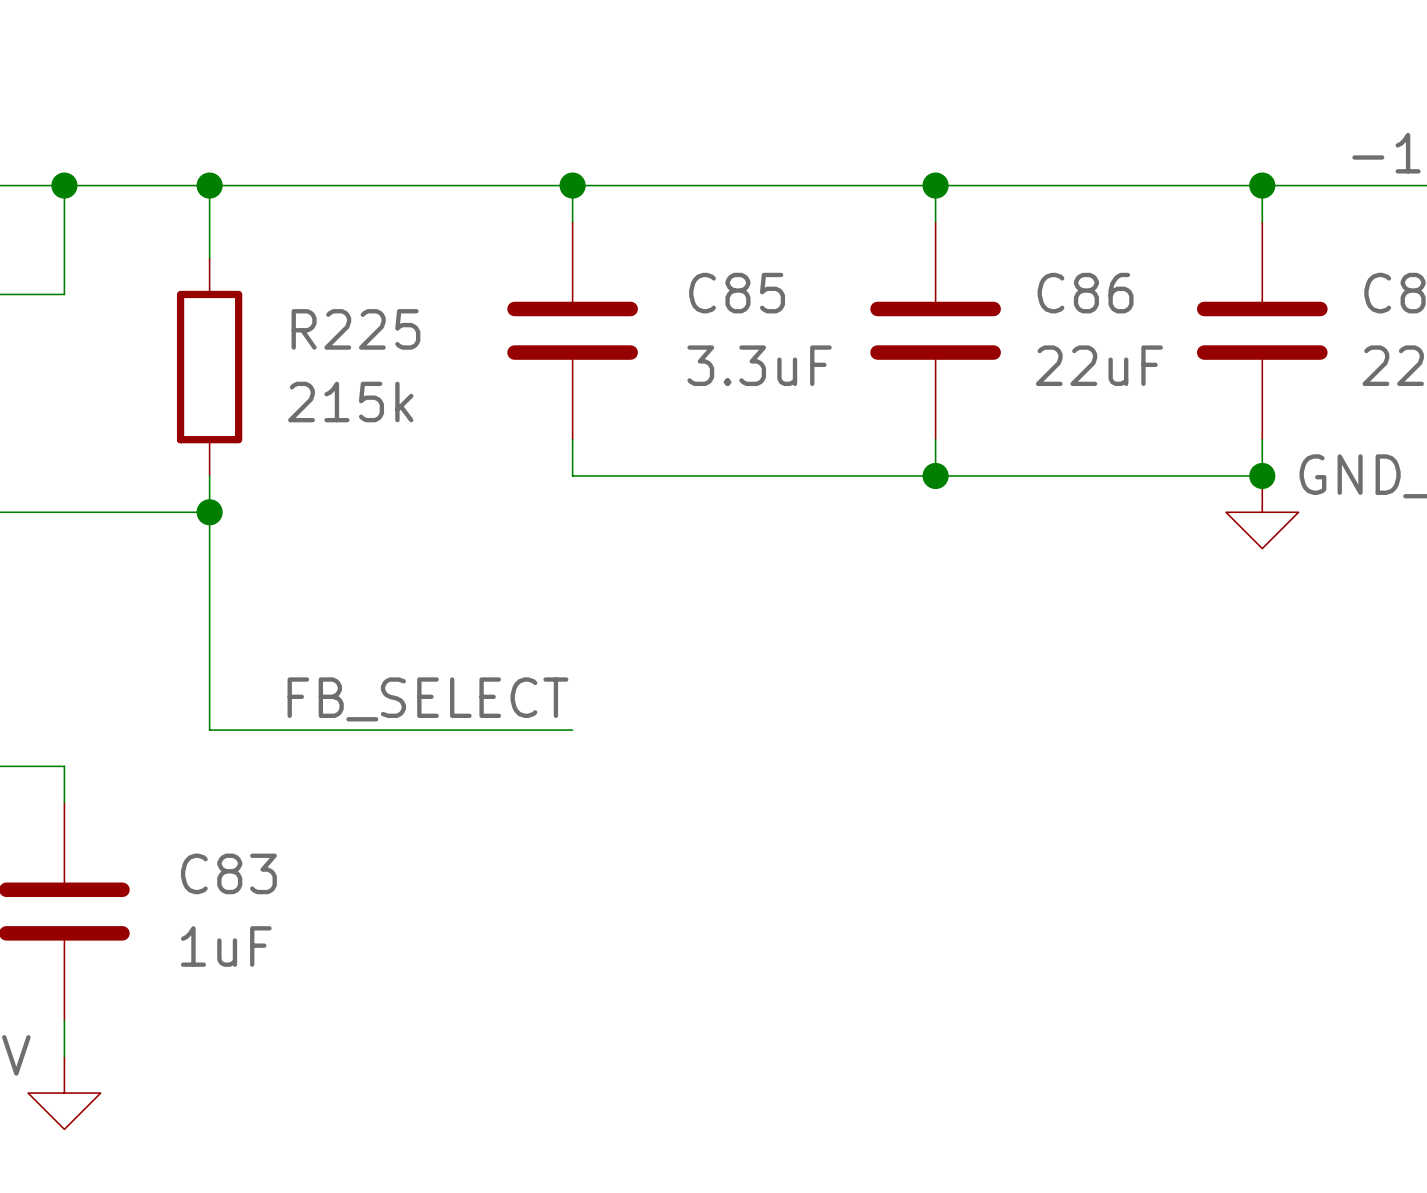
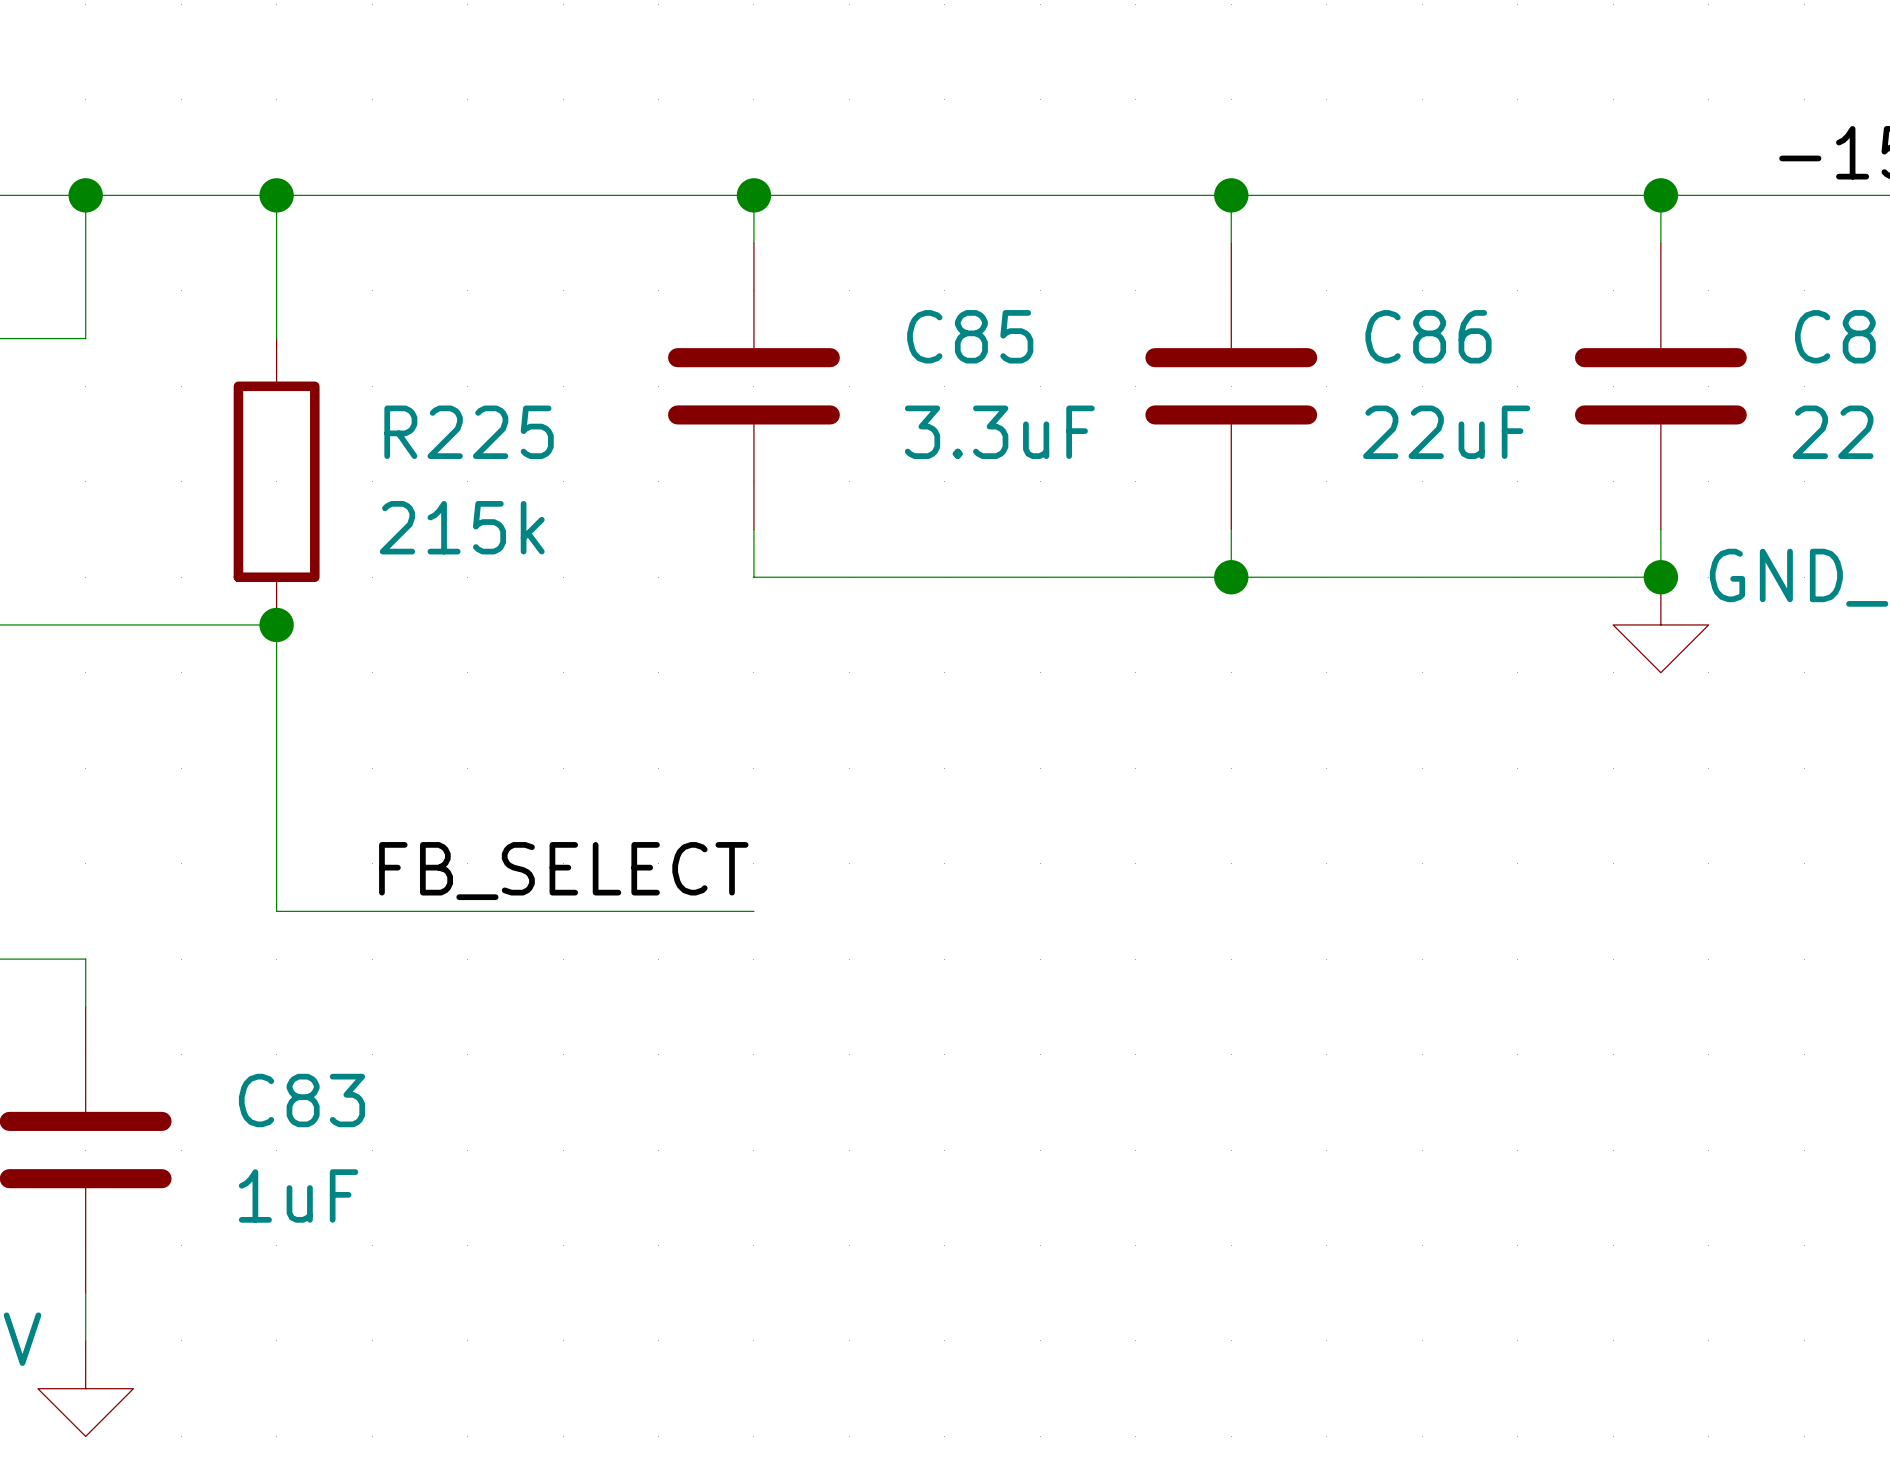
R225 position: (209, 367) -> (276, 481)

